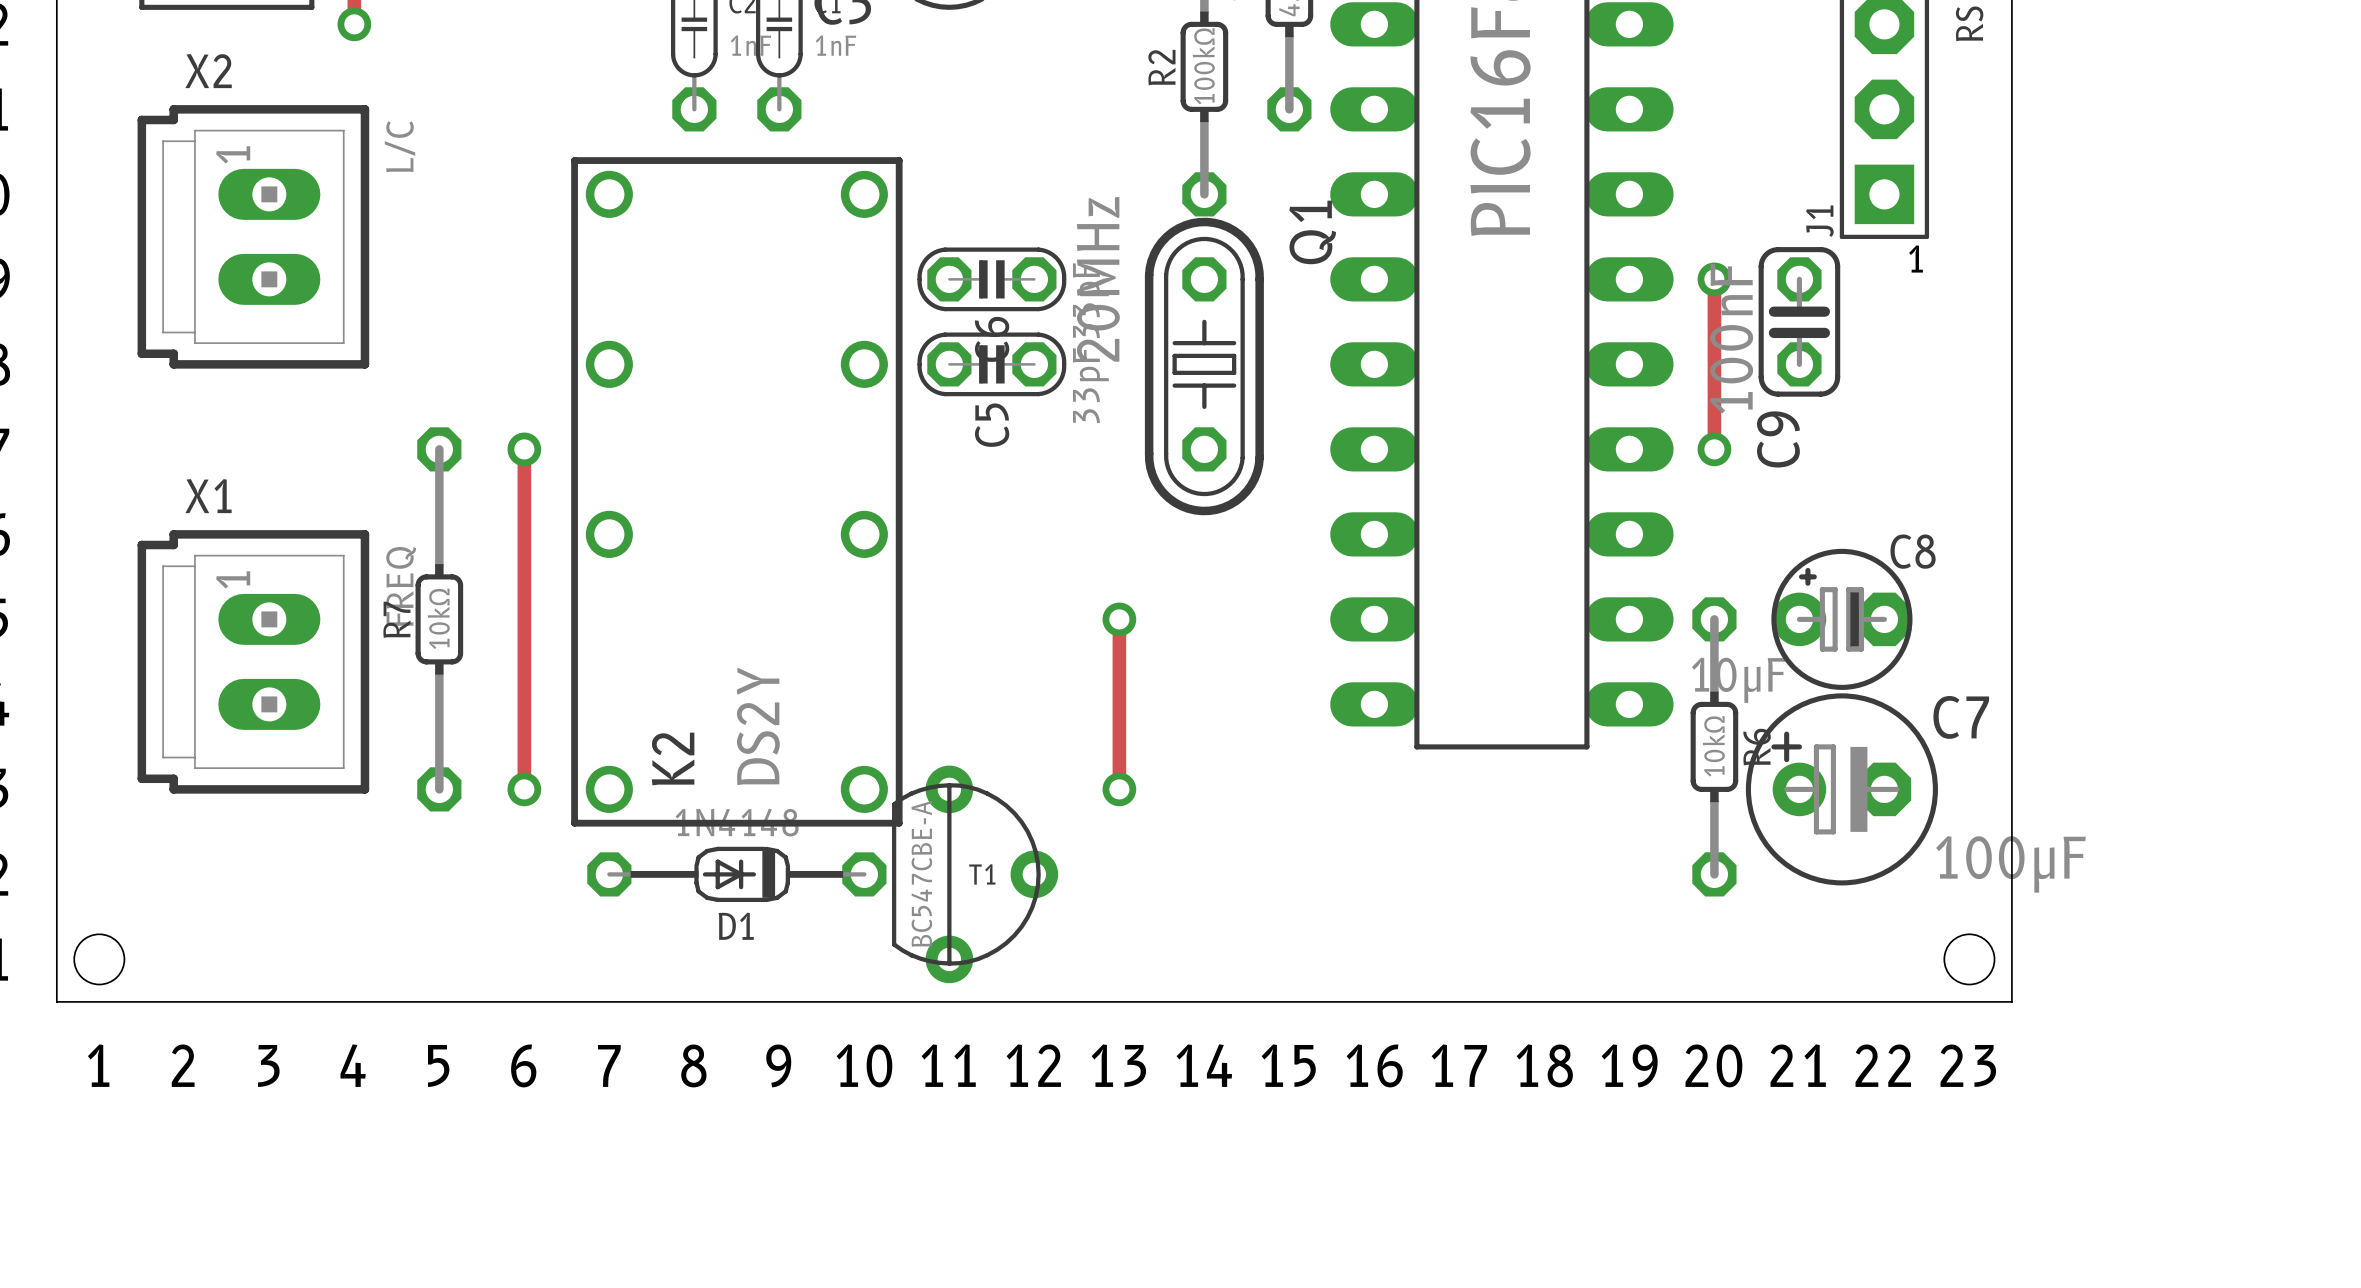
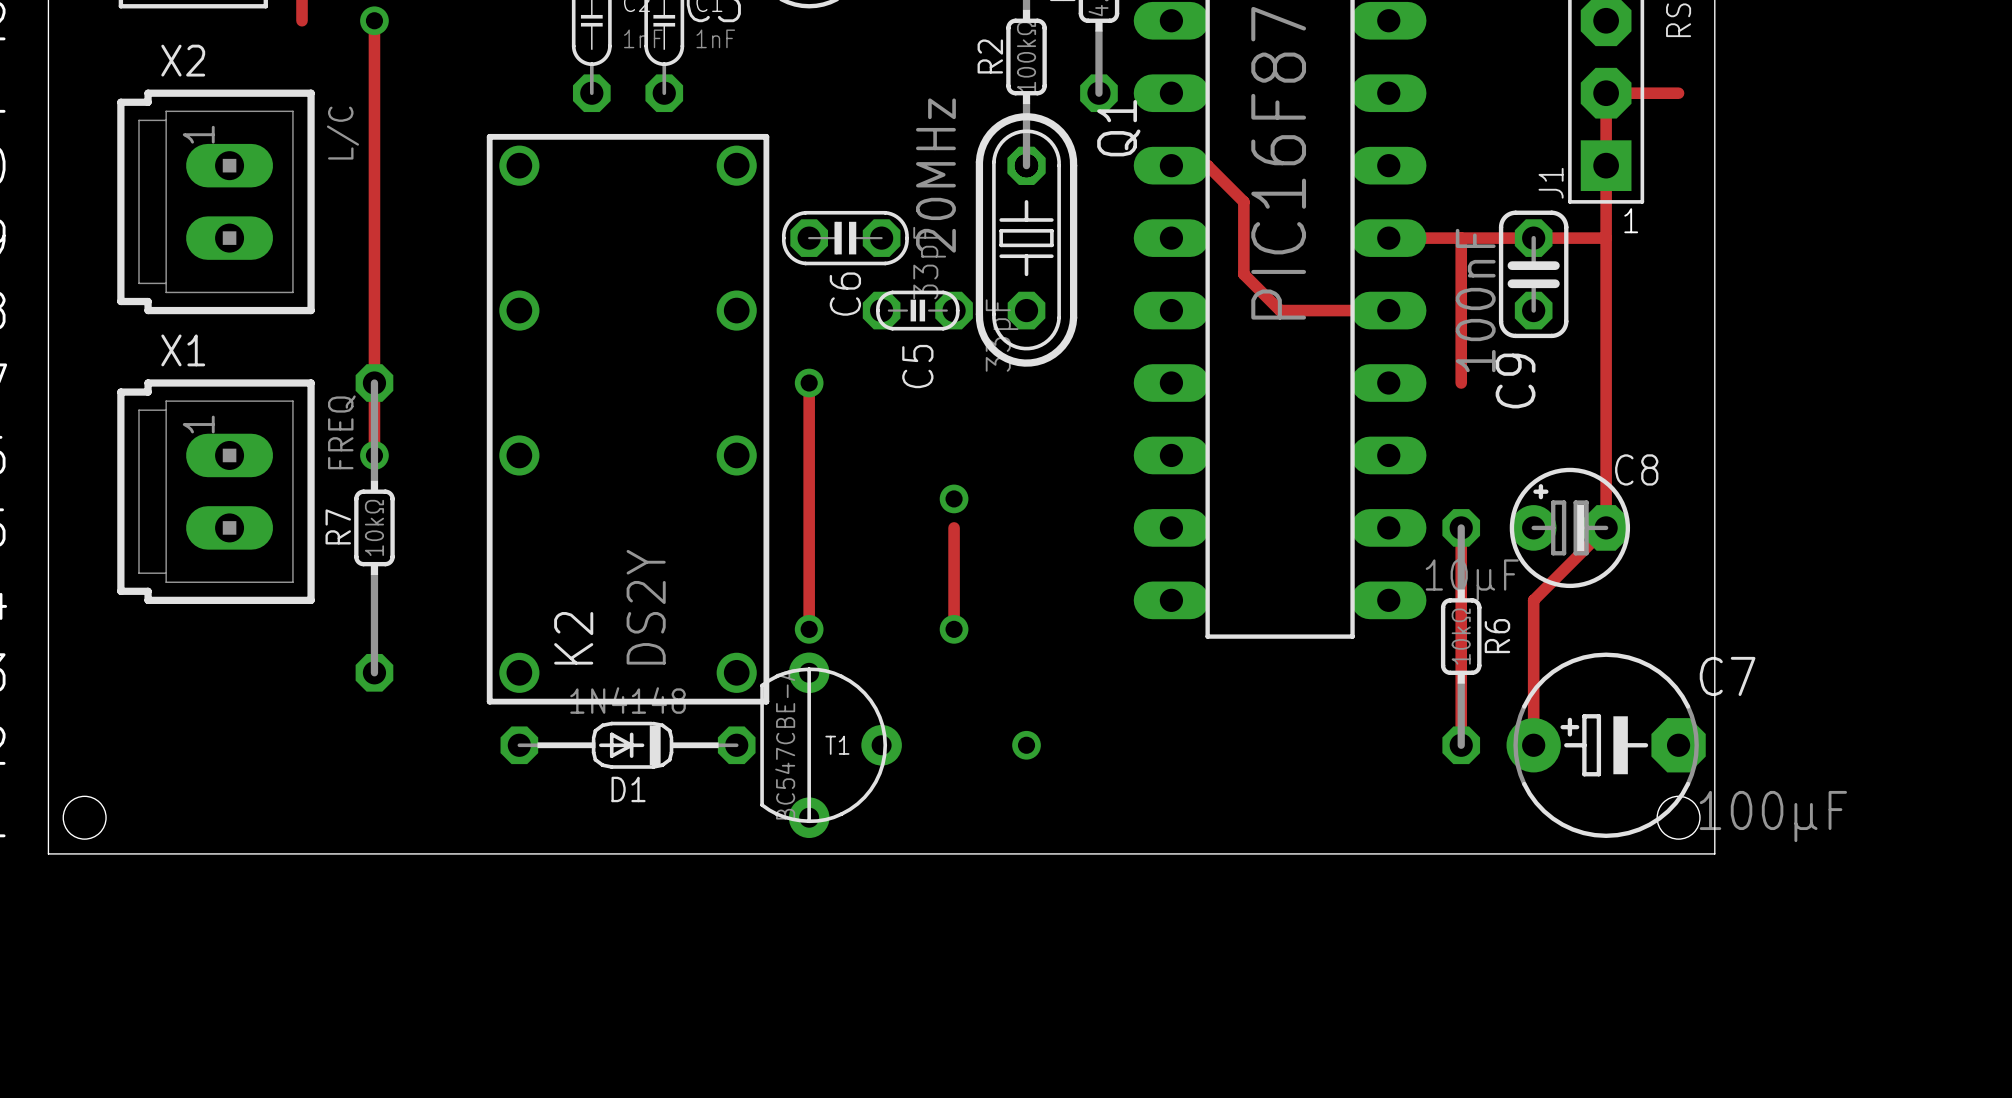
via position: (354, 24) -> (374, 20)
track: none -> (374, 20) (374, 455)
track: none -> (1678, 93) (1606, 93) (1606, 527) (1533, 600) (1533, 745)
track: none -> (1171, 165) (1207, 165) (1243, 201) (1243, 274) (1280, 310) (1388, 310)
track: none -> (1406, 238) (1606, 238)
via: (1714, 279) -> none
C5 footprint: [917, 332, 1067, 397] -> [862, 290, 973, 331]
Q1 position: (1204, 366) -> (1026, 239)
track: (524, 449) (524, 789) -> none
via position: (524, 449) -> (374, 455)
track: none -> (809, 383) (809, 629)
via: none -> (809, 383)
via: (1714, 449) -> none
via position: (1119, 619) -> (954, 498)
track: none -> (1461, 527) (1461, 745)
X1 position: (253, 661) -> (215, 491)
C7 footprint: [1745, 693, 1938, 886] -> [1506, 652, 1706, 839]
via: none -> (809, 629)
track: (1119, 738) (1119, 789) -> none
via: (524, 789) -> none
via position: (1119, 789) -> (954, 629)
via: none -> (1026, 745)
text: 1 (98, 1065) -> none
text: 2 (183, 1065) -> none
text: 3 (268, 1065) -> none
text: 4 (353, 1065) -> none
text: 5 (438, 1065) -> none
text: 6 (523, 1065) -> none
text: 7 (609, 1065) -> none
text: 8 (693, 1065) -> none
text: 9 (778, 1065) -> none
text: 10 (864, 1065) -> none
text: 11 (948, 1065) -> none
text: 12 (1033, 1065) -> none
text: 13 (1118, 1065) -> none
text: 14 (1204, 1065) -> none
text: 15 (1288, 1065) -> none
text: 16 (1374, 1065) -> none
text: 17 (1459, 1065) -> none
text: 18 (1544, 1065) -> none
text: 19 (1629, 1065) -> none
text: 20 (1713, 1065) -> none
text: 21 (1798, 1065) -> none
text: 22 (1883, 1065) -> none
text: 23 (1968, 1065) -> none

